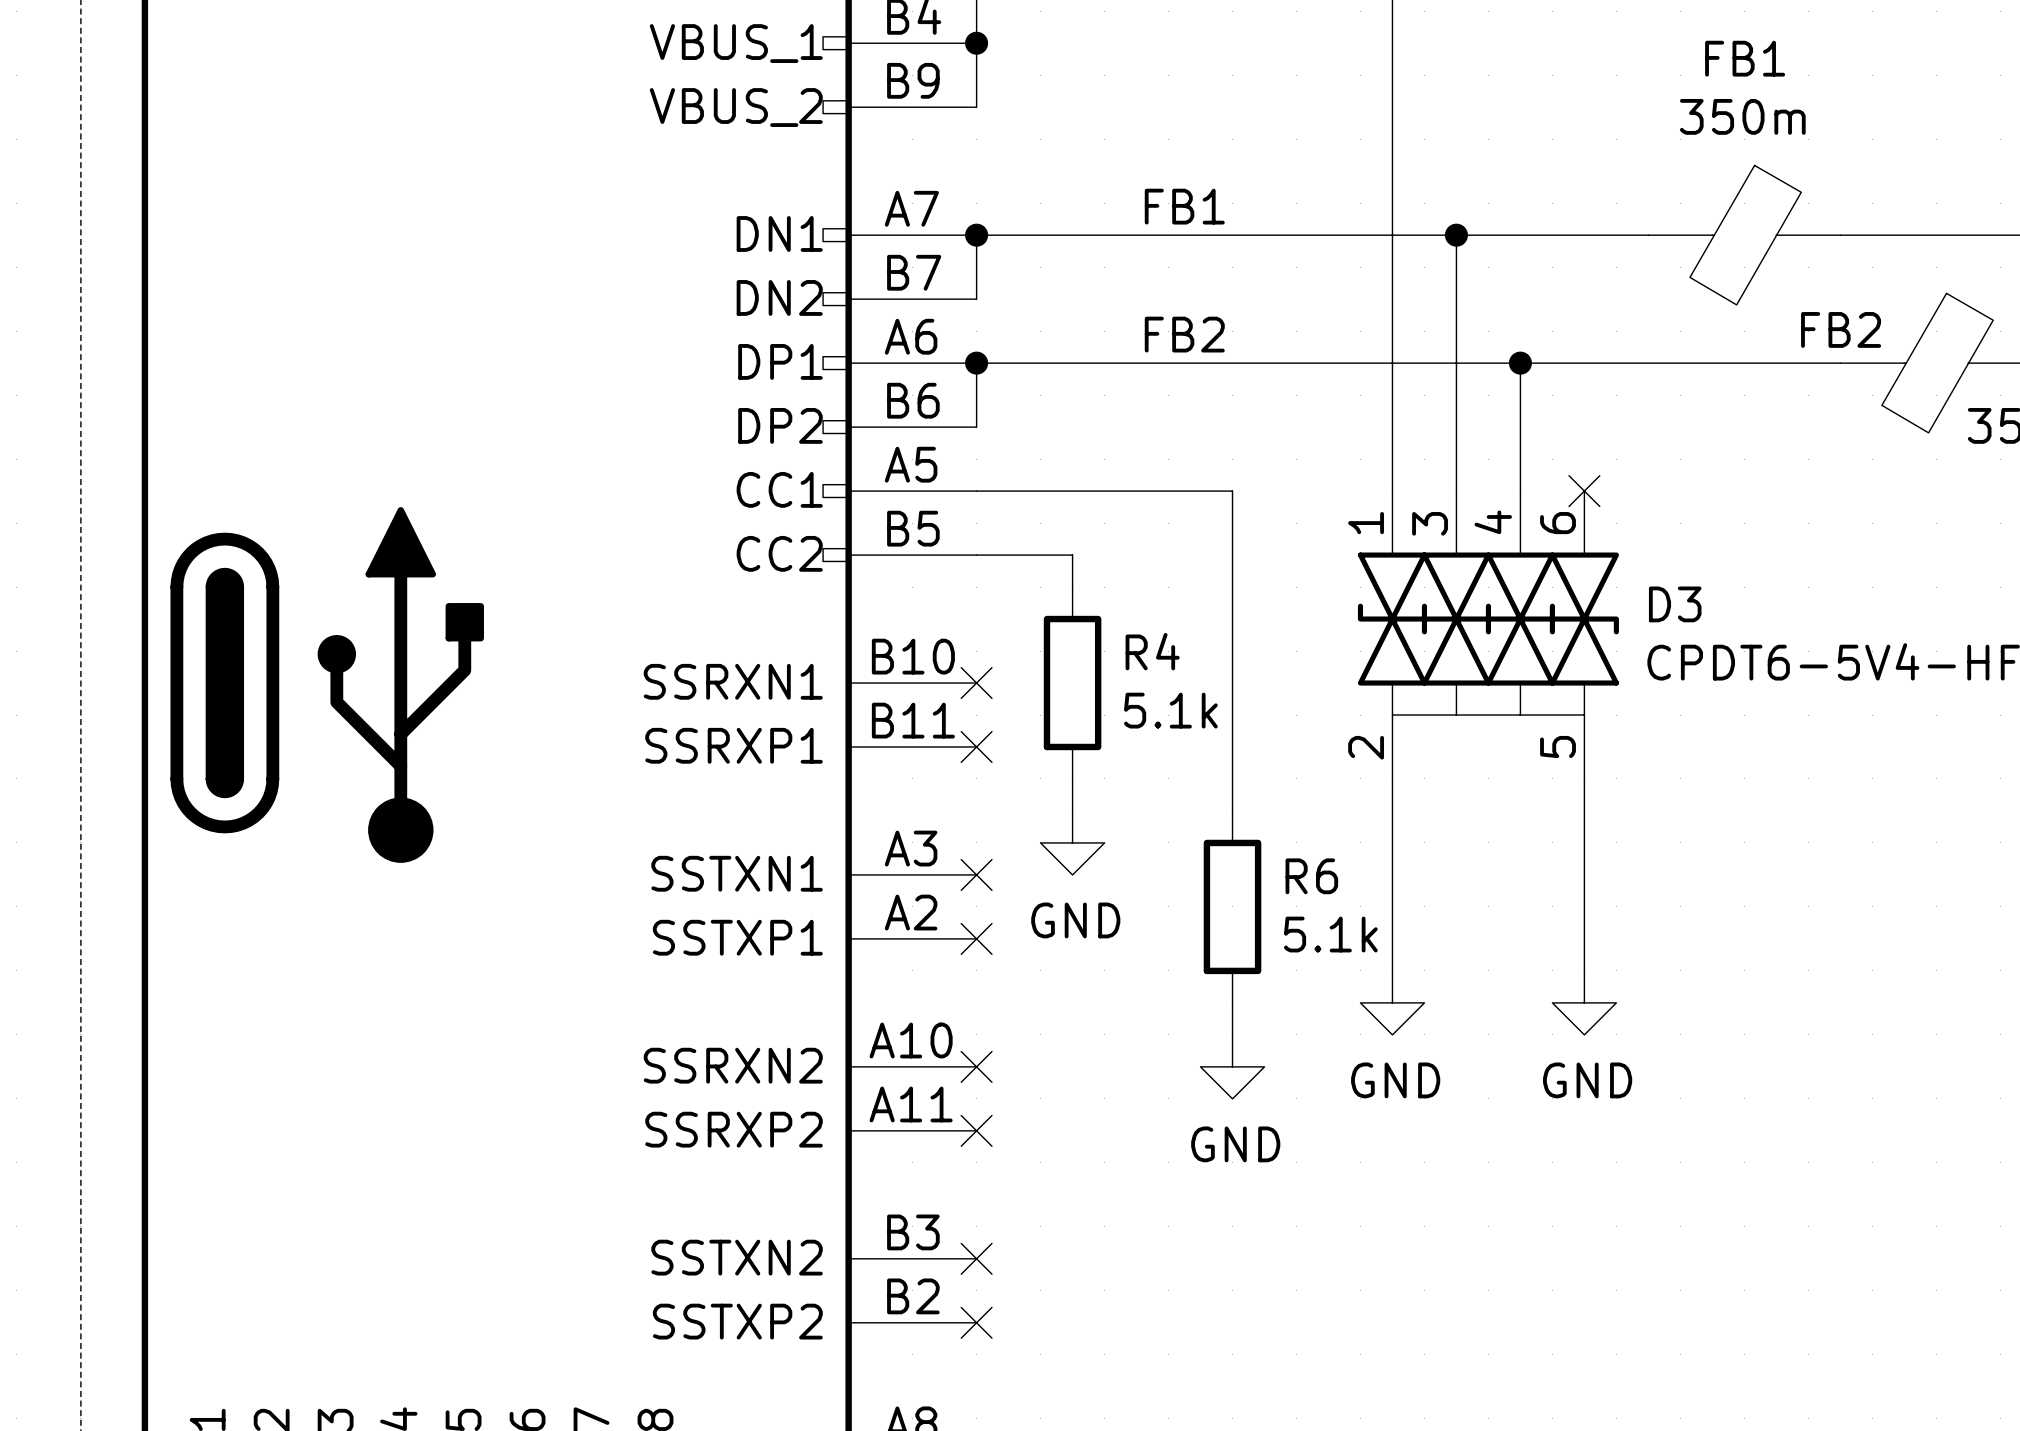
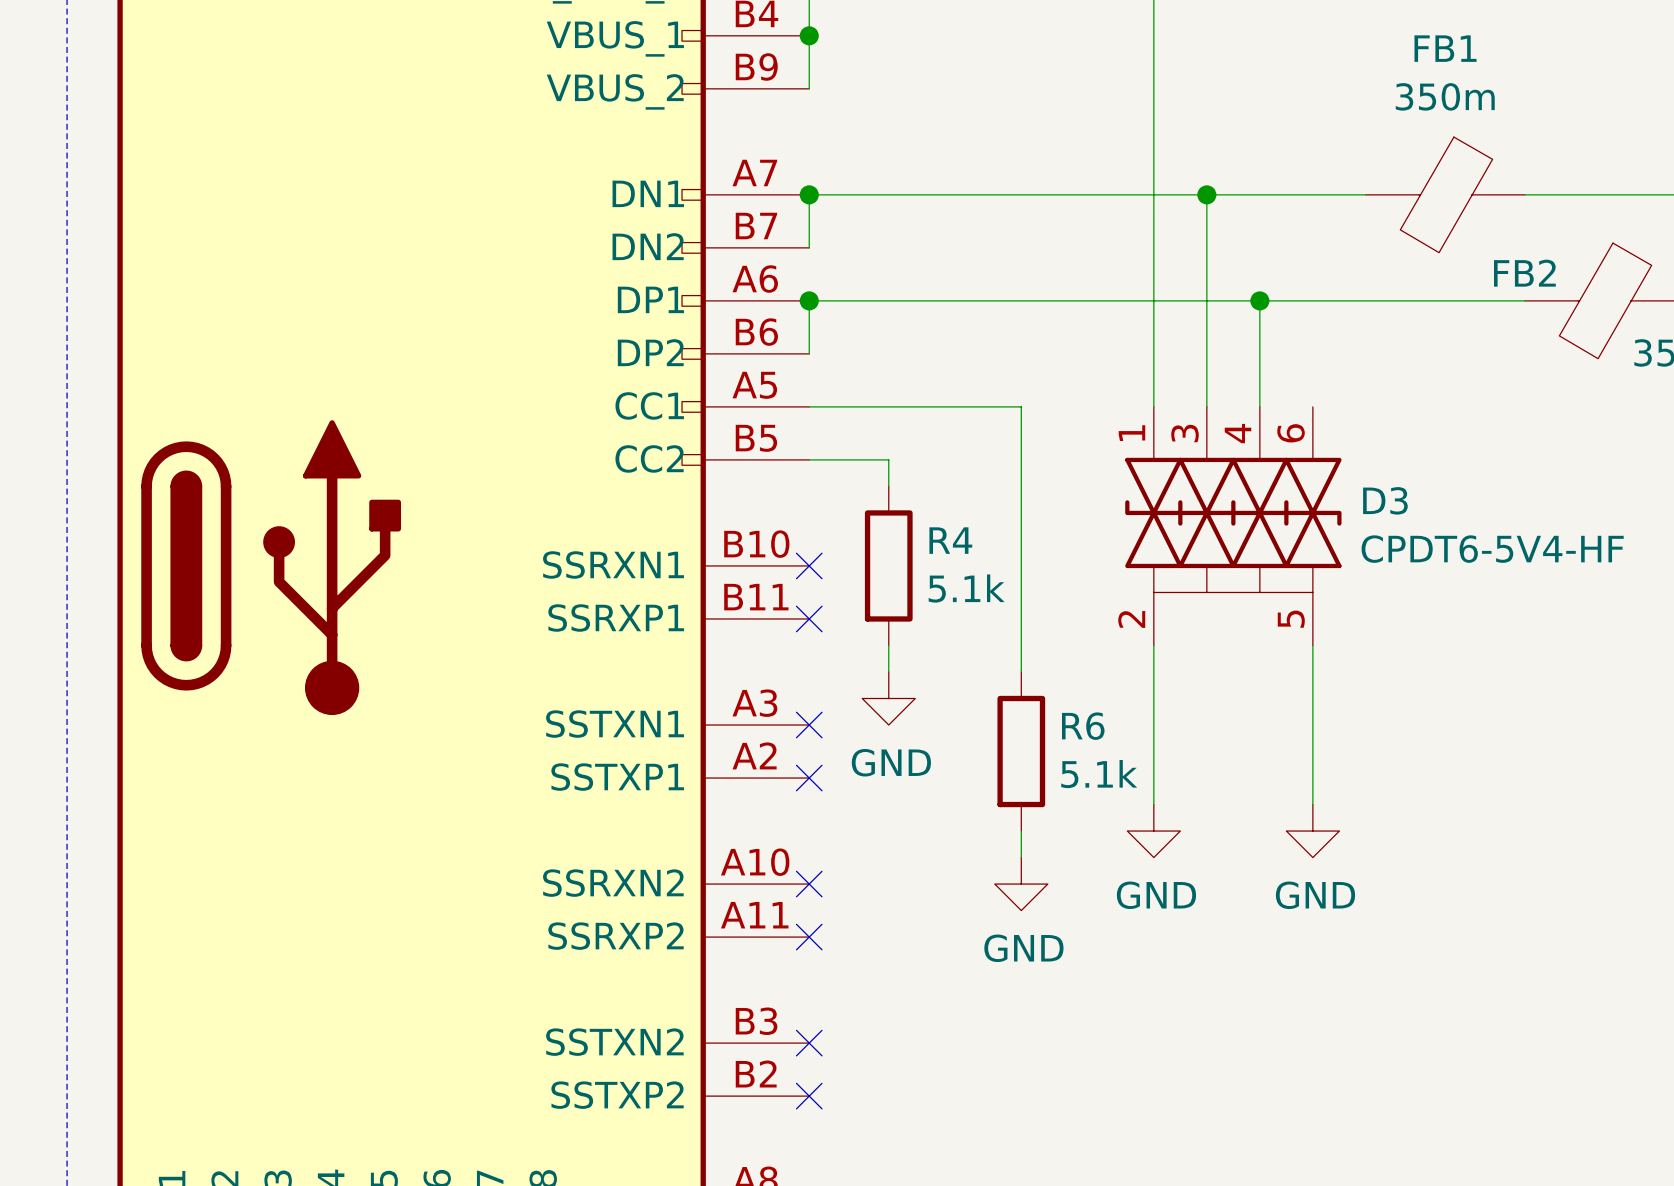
label: FB1 (1184, 206) -> none
label: FB2 (1184, 334) -> none
no-connect mark: (1584, 491) -> none

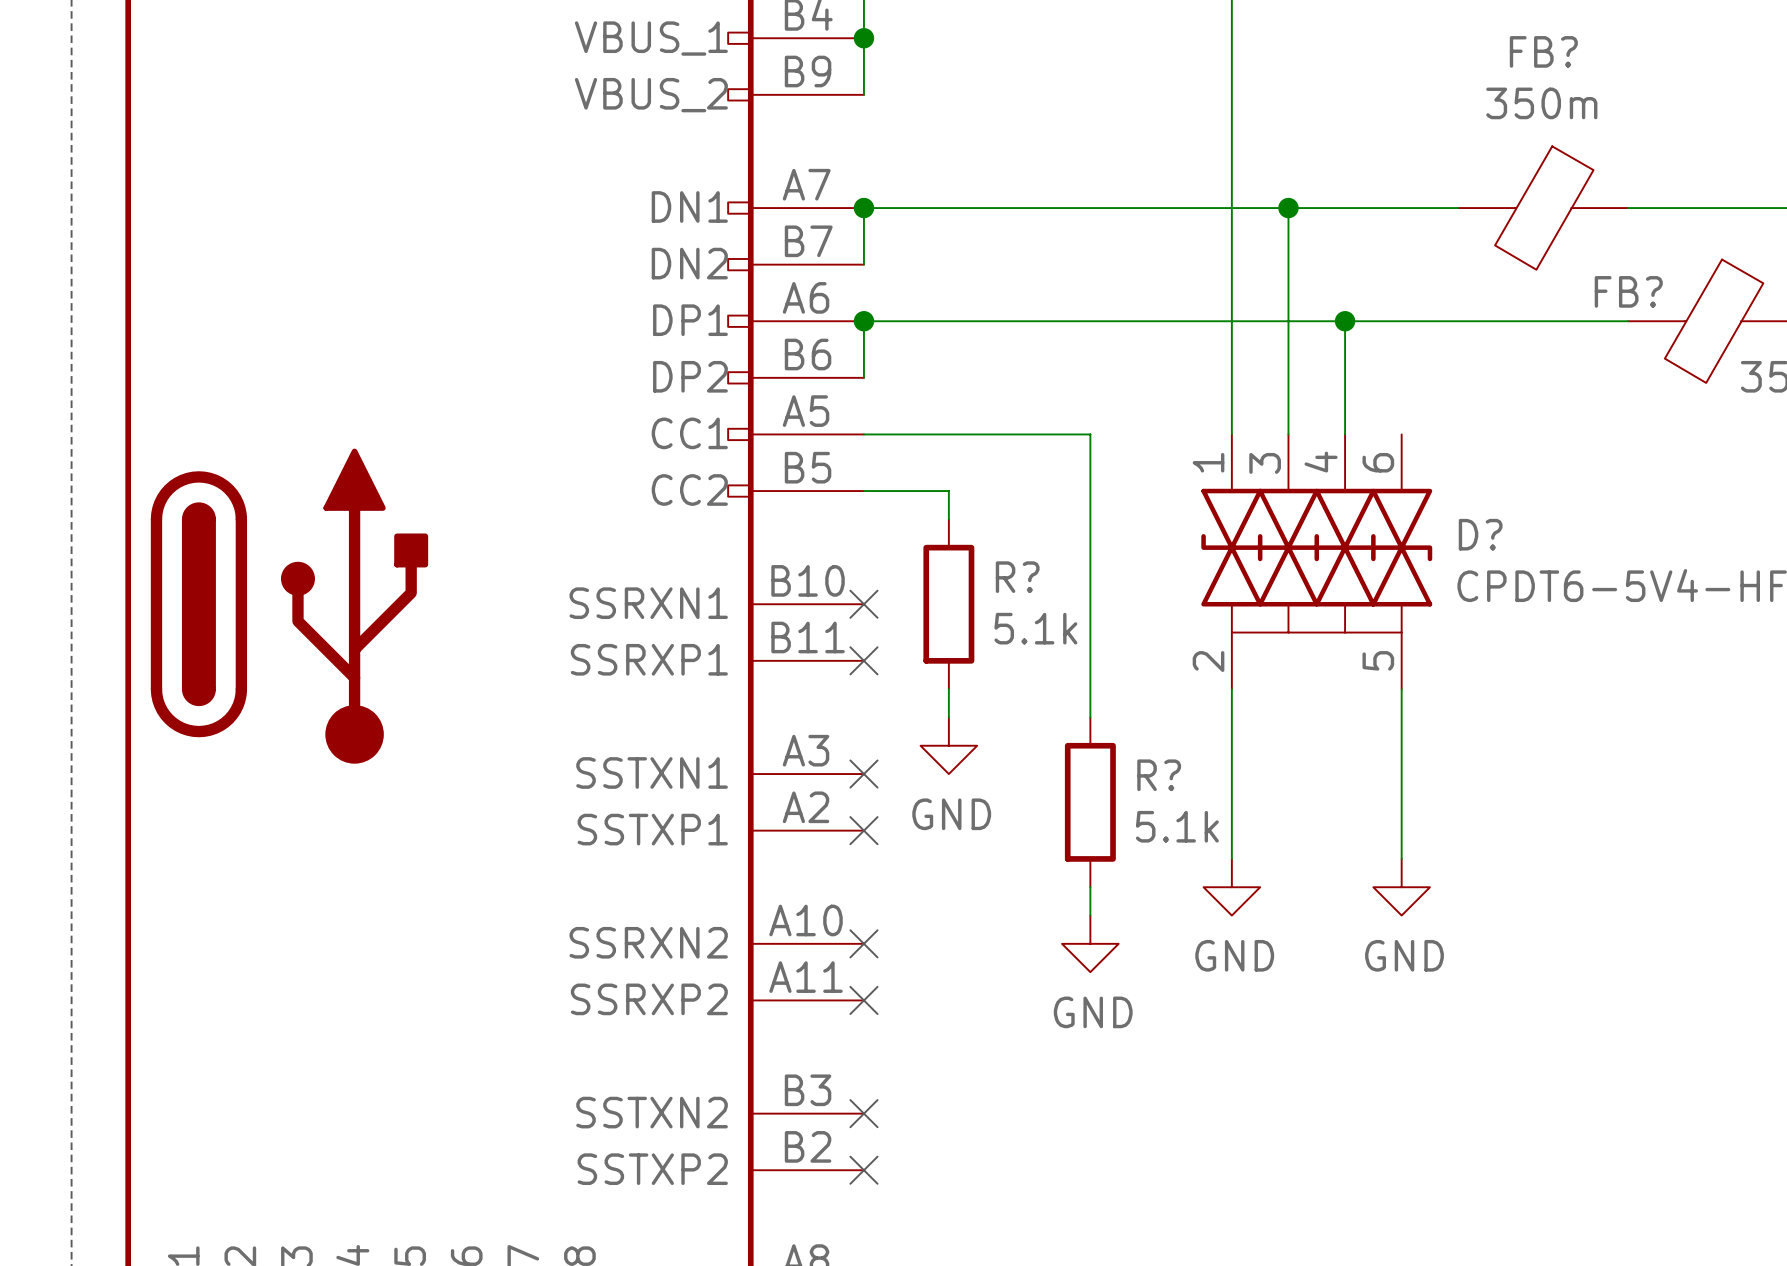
FB1 name: FB1 (1445, 48) -> FB? (1543, 51)
FB2 name: FB2 (1524, 273) -> FB? (1628, 291)
D3 name: D3 (1385, 500) -> D? (1480, 534)
R4 name: R4 (950, 540) -> R? (1017, 577)
R6 name: R6 (1083, 726) -> R? (1159, 775)

